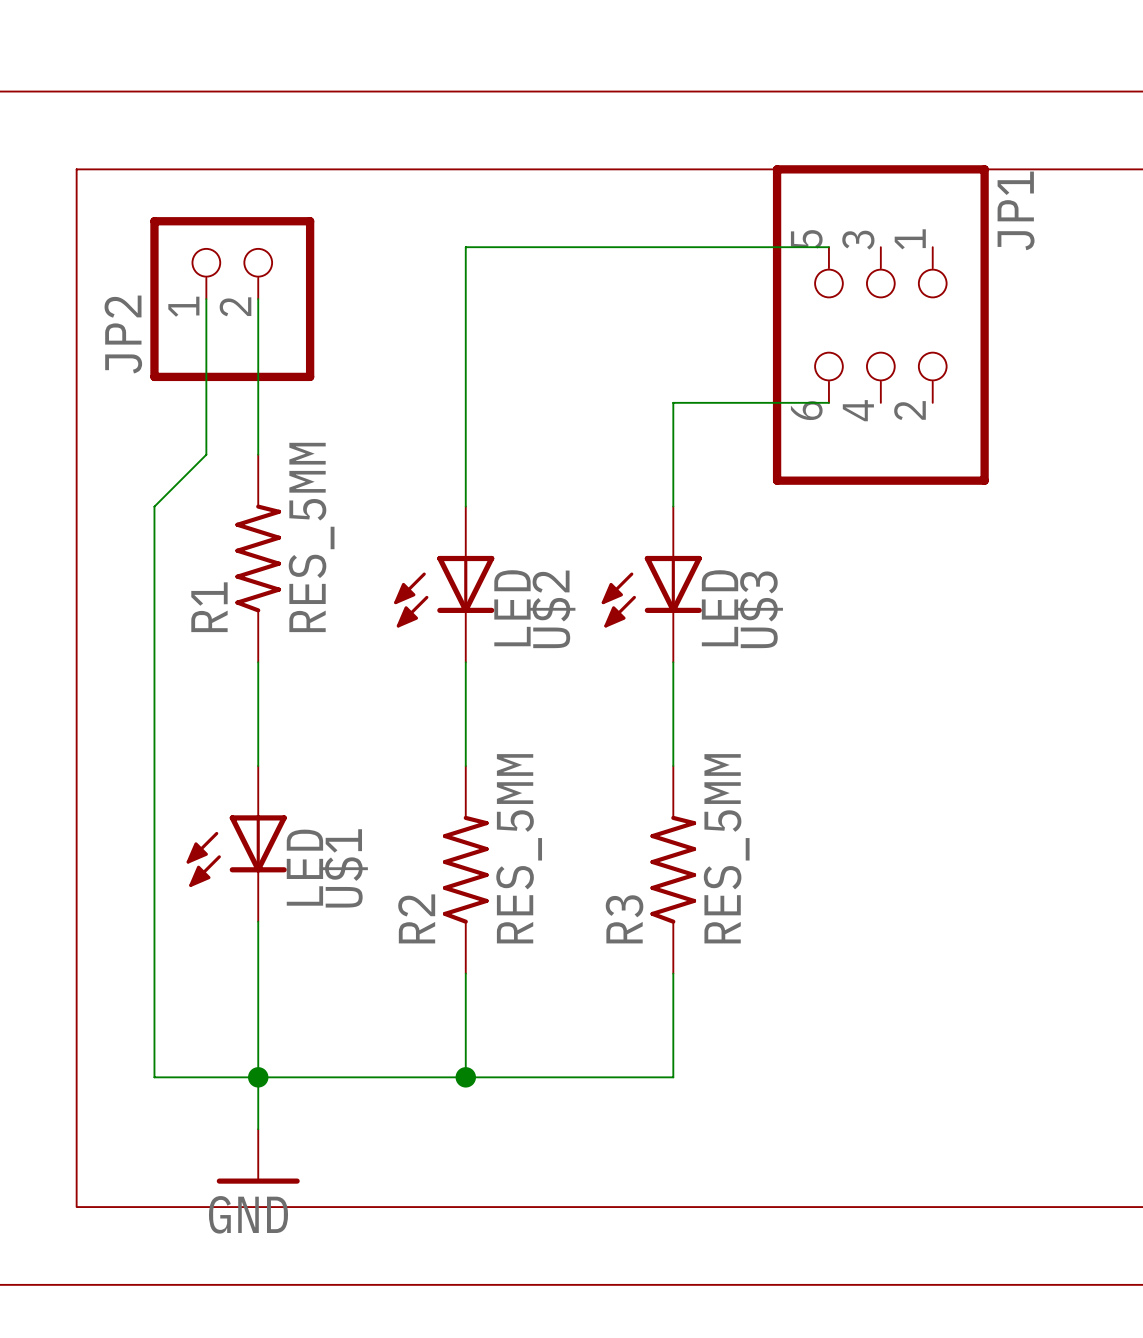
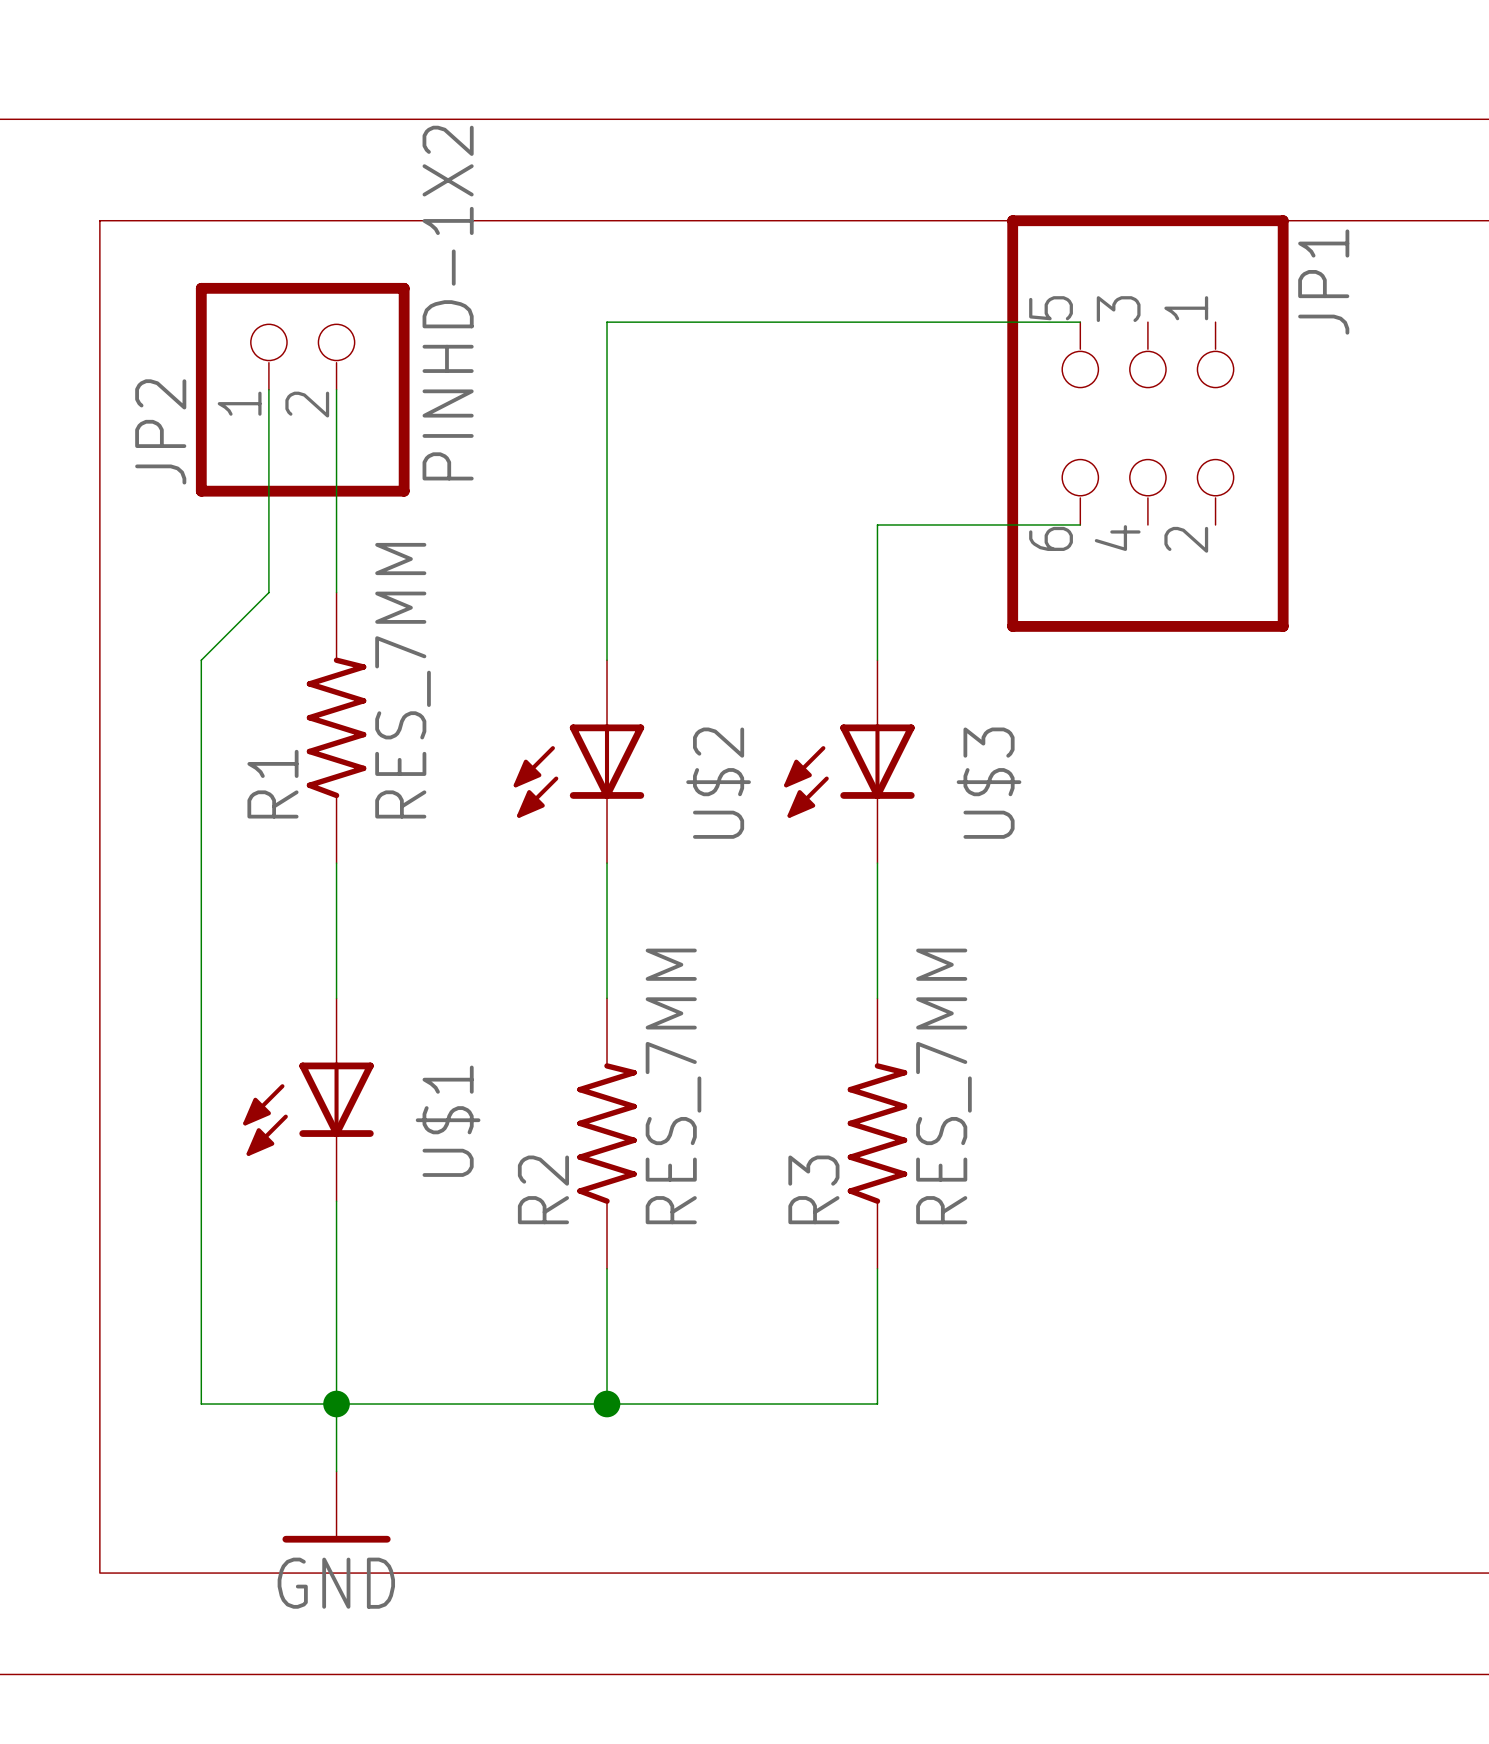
JP2 value: none -> PINHD-1X2 (448, 303)
R1 value: RES_5MM (311, 537) -> RES_7MM (403, 680)
U$2 value: LED (512, 608) -> none
U$3 value: LED (720, 608) -> none
R2 value: RES_5MM (519, 848) -> RES_7MM (673, 1086)
R3 value: RES_5MM (726, 848) -> RES_7MM (943, 1086)
U$1 value: LED (304, 867) -> none

